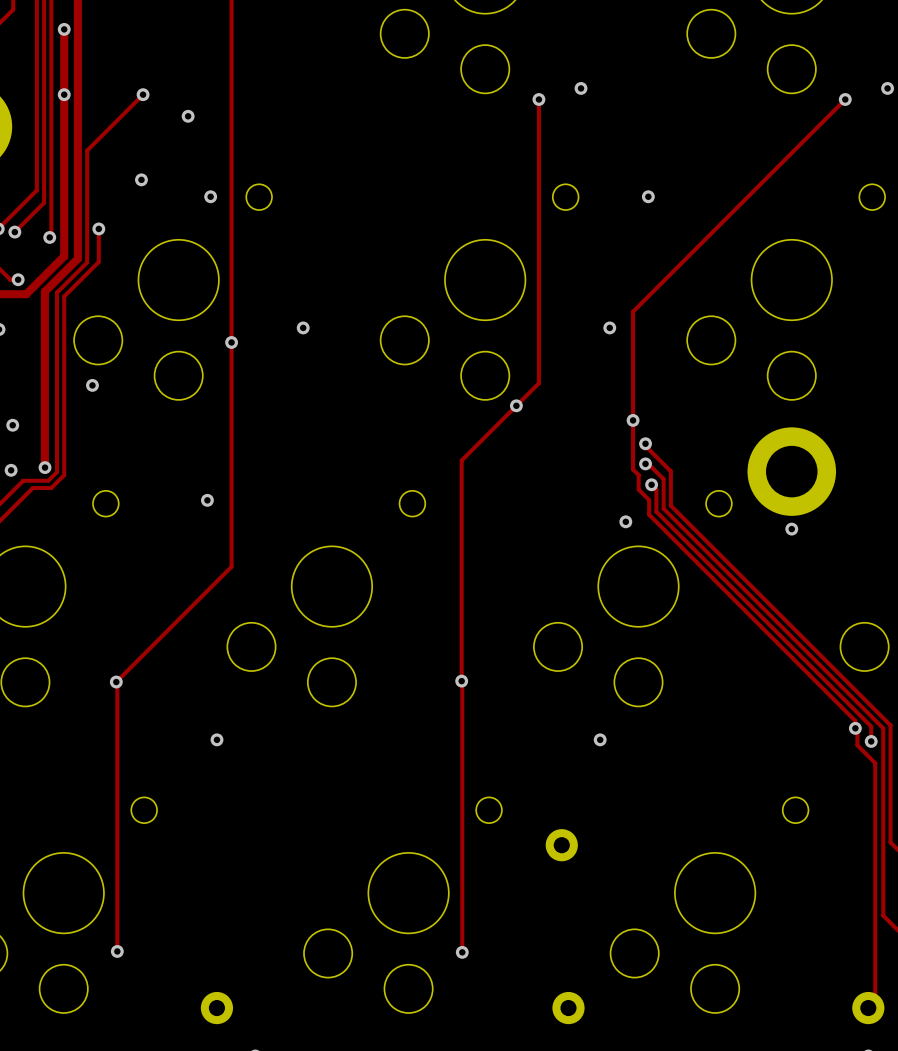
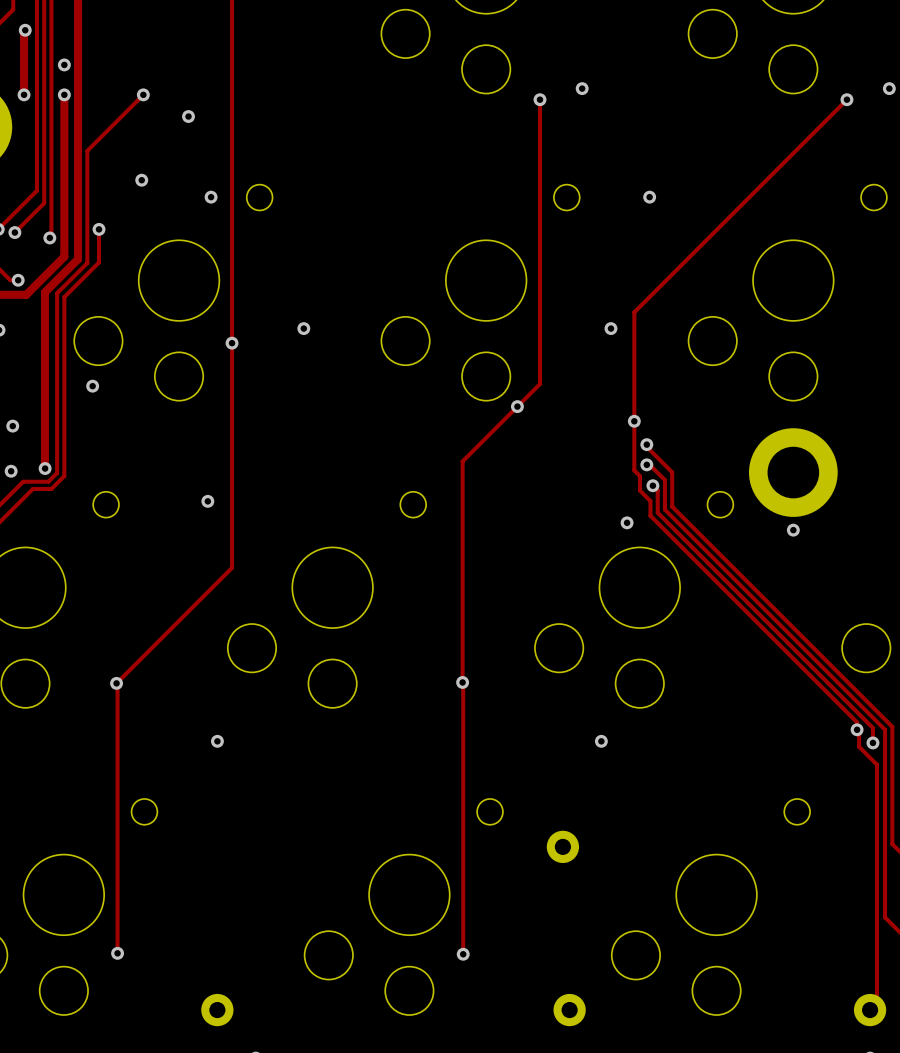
track: (64, 29) (64, 94) -> none
via: (64, 29) -> none
track: none -> (25, 30) (24, 94)
via: none -> (25, 30)
via: none -> (64, 64)
via: none -> (24, 94)

